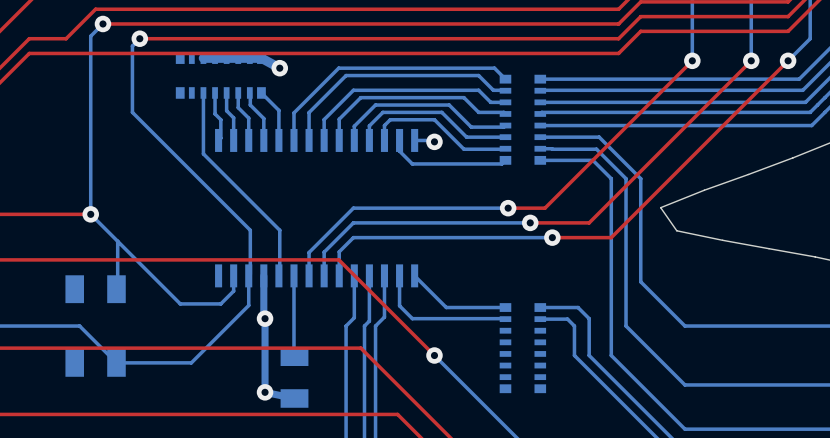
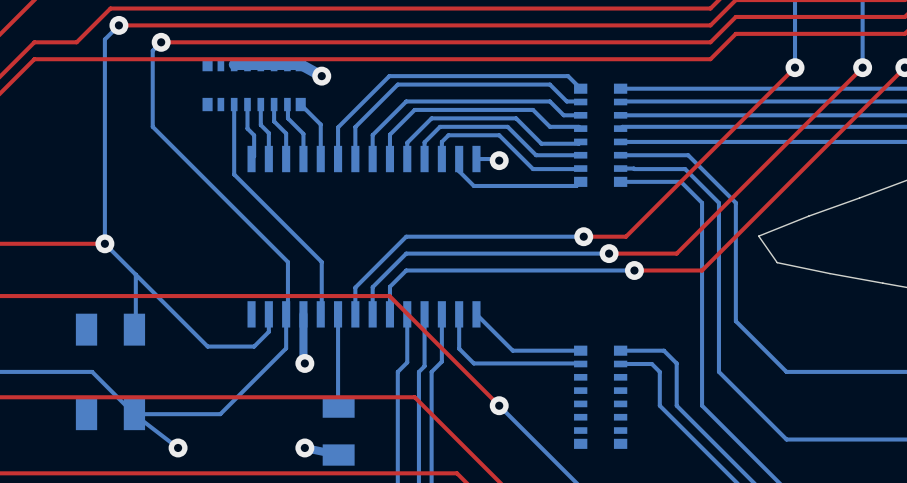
bottom track: (265, 318) (265, 392) -> none
bottom track: none -> (135, 415) (178, 447)
via: none -> (178, 447)

